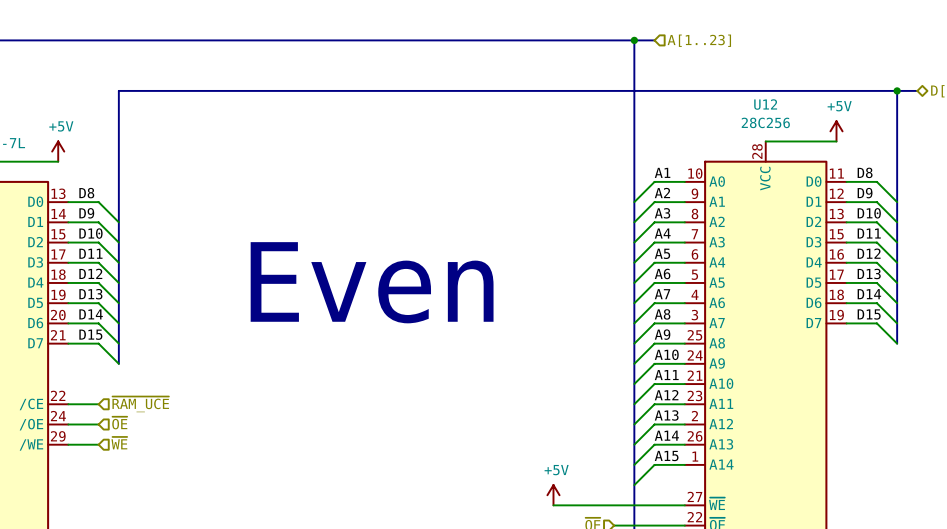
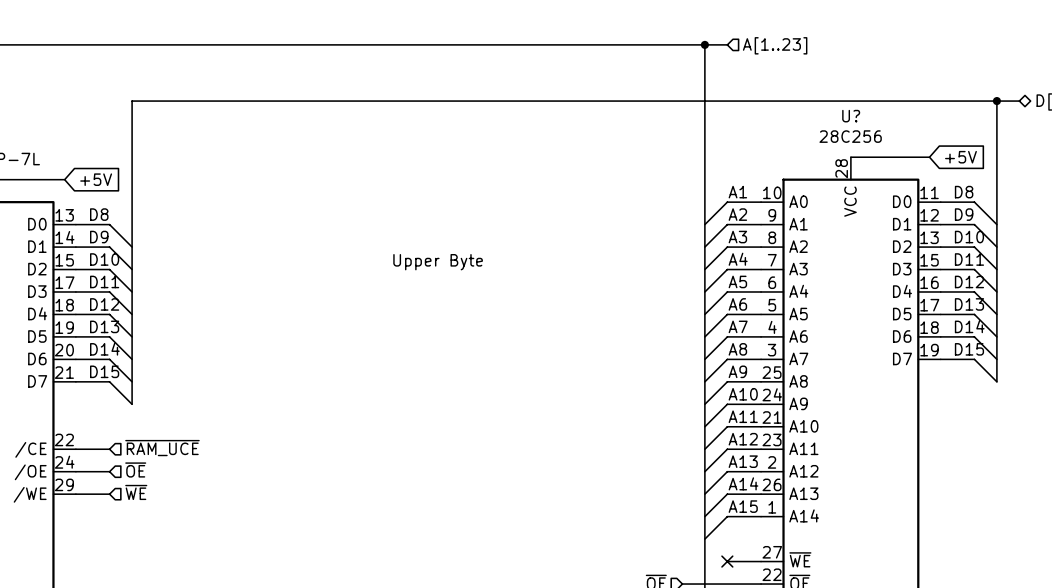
U12 name: U12 (765, 104) -> U? (851, 116)
power symbol: +5V (836, 131) -> none
global label: none -> +5V (960, 157)
power symbol: +5V (58, 151) -> none
global label: none -> +5V (96, 179)
text: none -> Upper Byte (438, 262)
text: Even (372, 282) -> none
power symbol: +5V (553, 495) -> none
wire: (553, 505) (654, 505) -> none
no-connect mark: none -> (727, 561)

